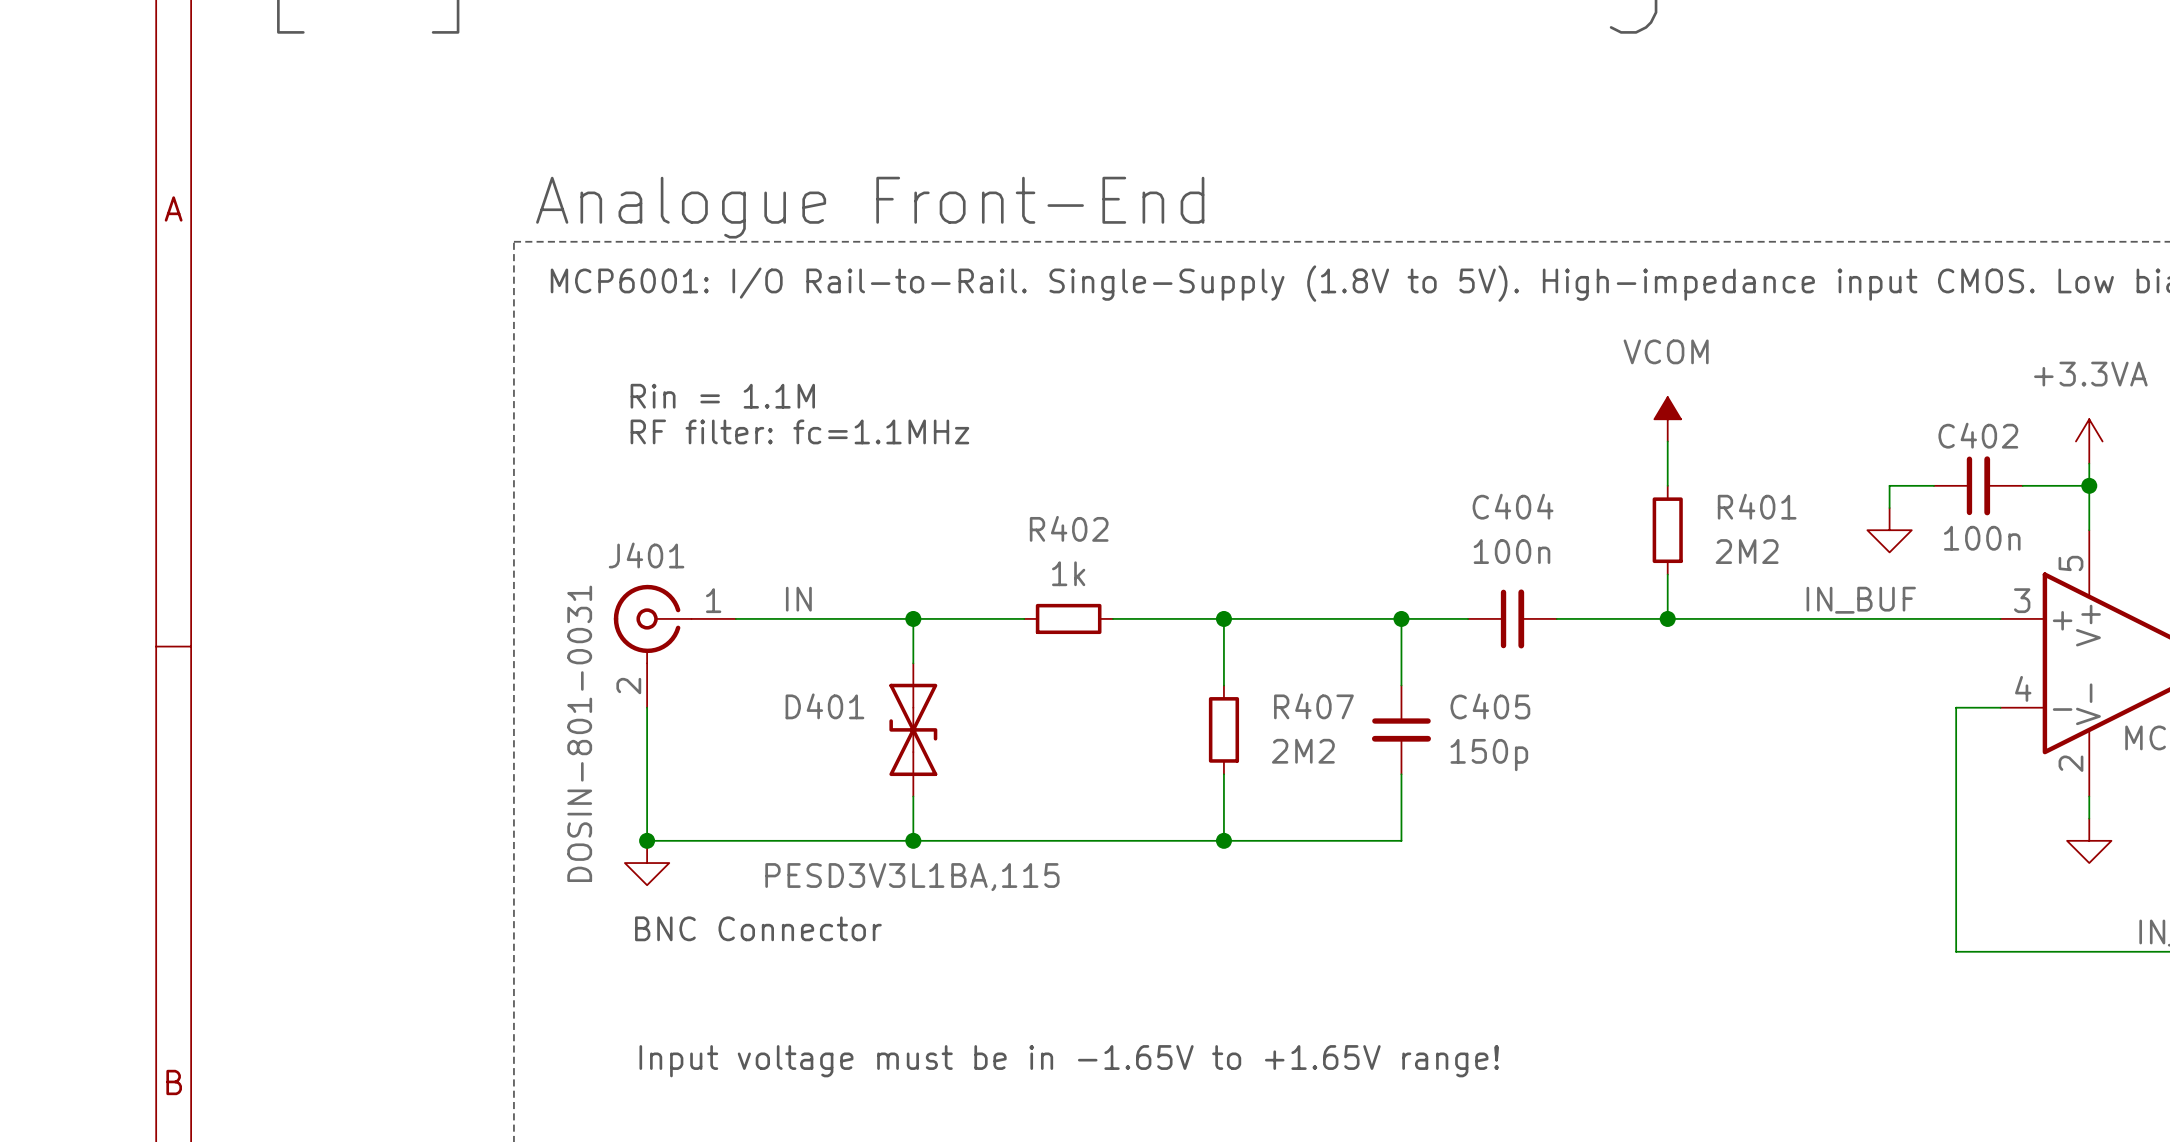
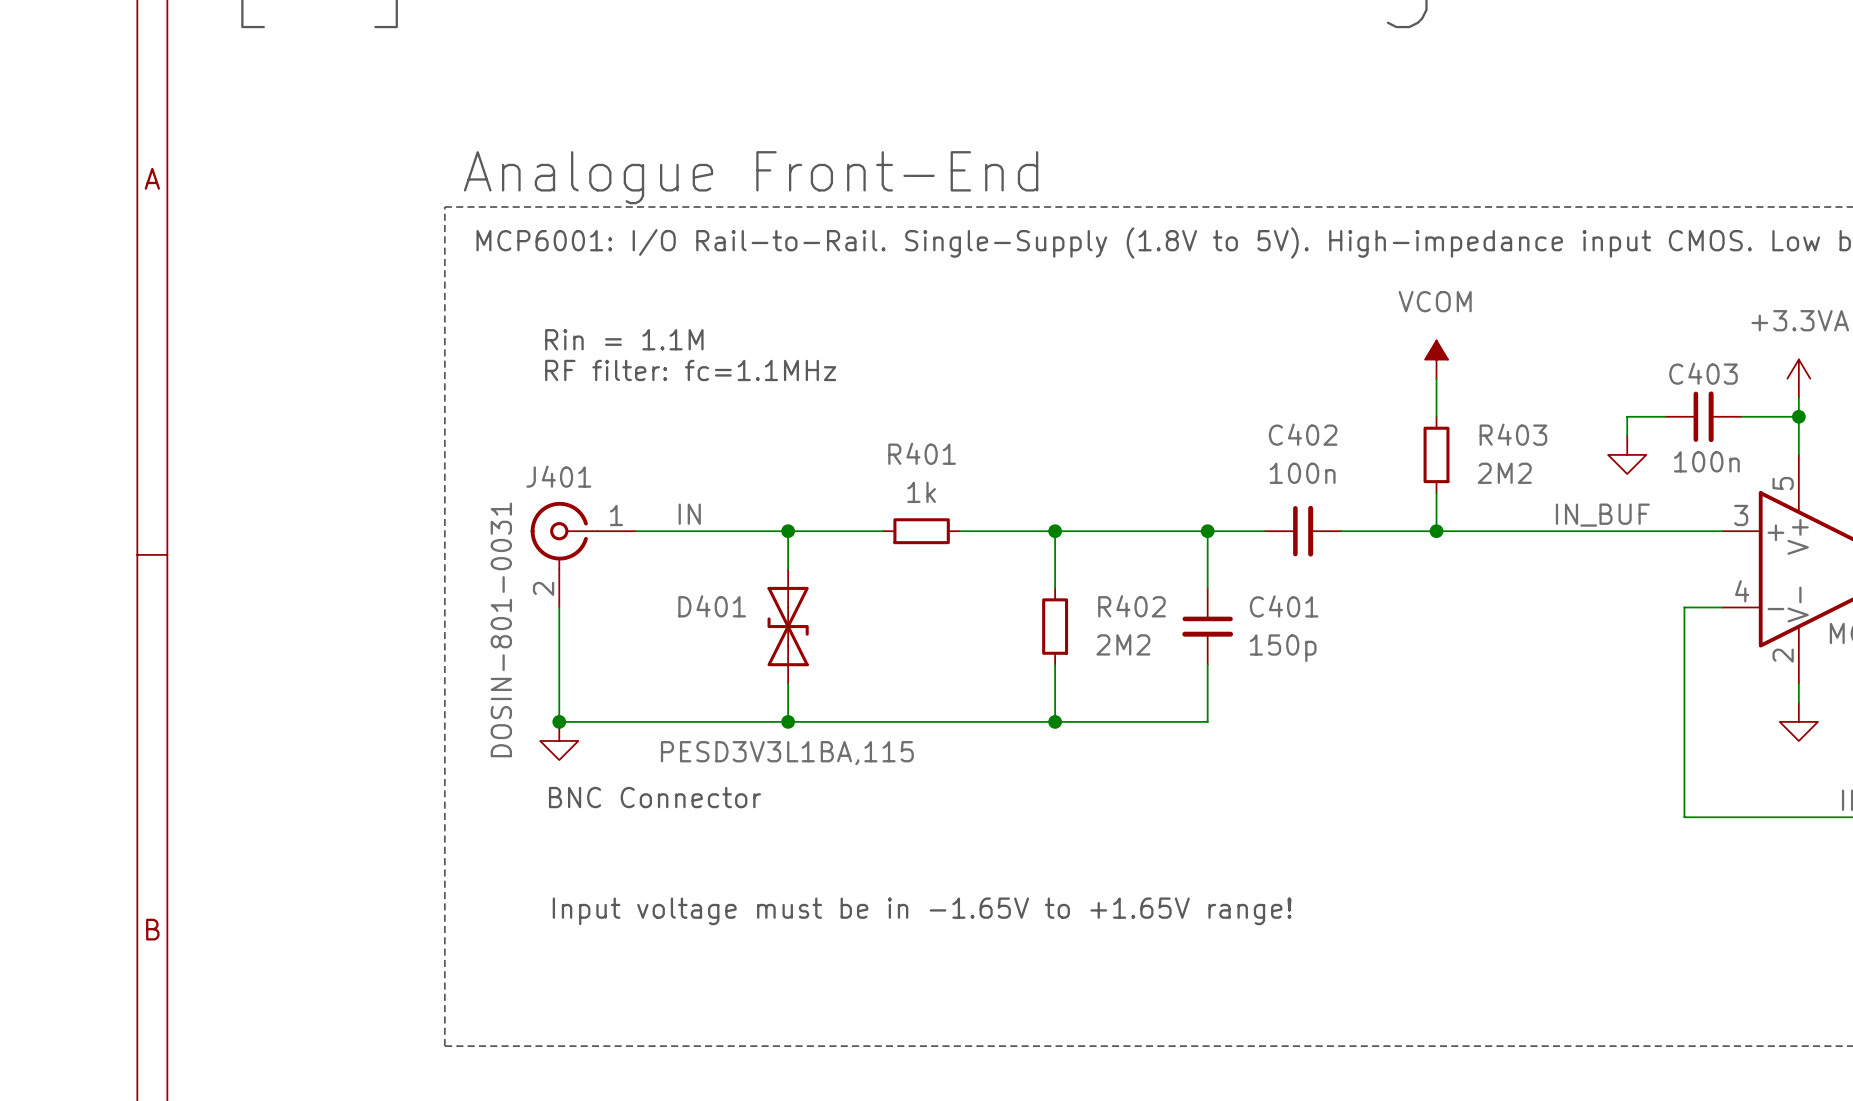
C402 name: C402 (1978, 435) -> C403 (1703, 373)
C404 name: C404 (1513, 506) -> C402 (1303, 434)
R401 name: R401 (1757, 506) -> R403 (1513, 434)
R402 name: R402 (1069, 528) -> R401 (922, 453)
R407 name: R407 (1313, 706) -> R402 (1131, 606)
C405 name: C405 (1490, 706) -> C401 (1284, 606)

